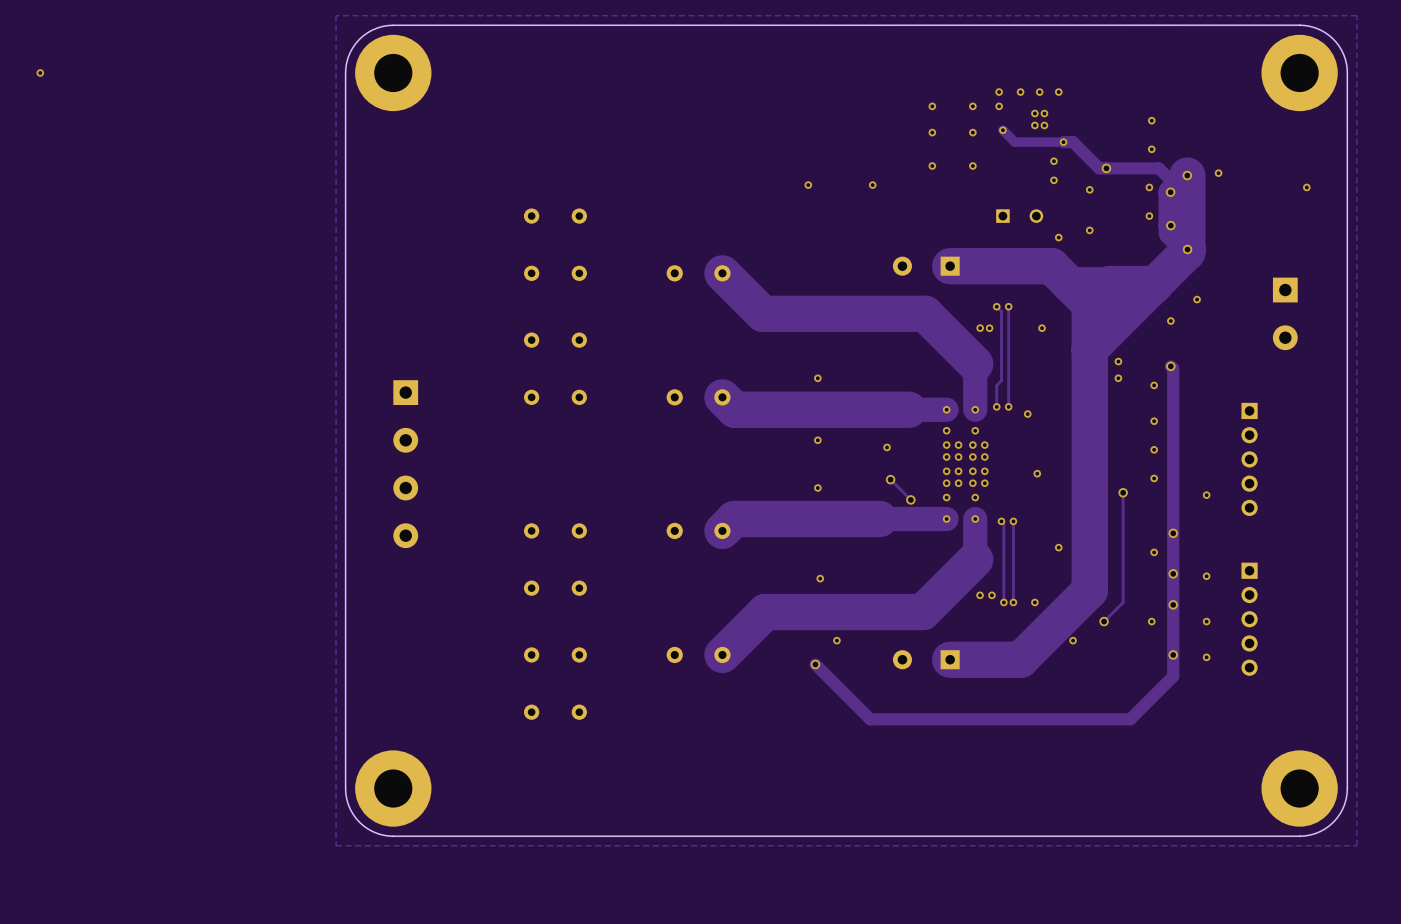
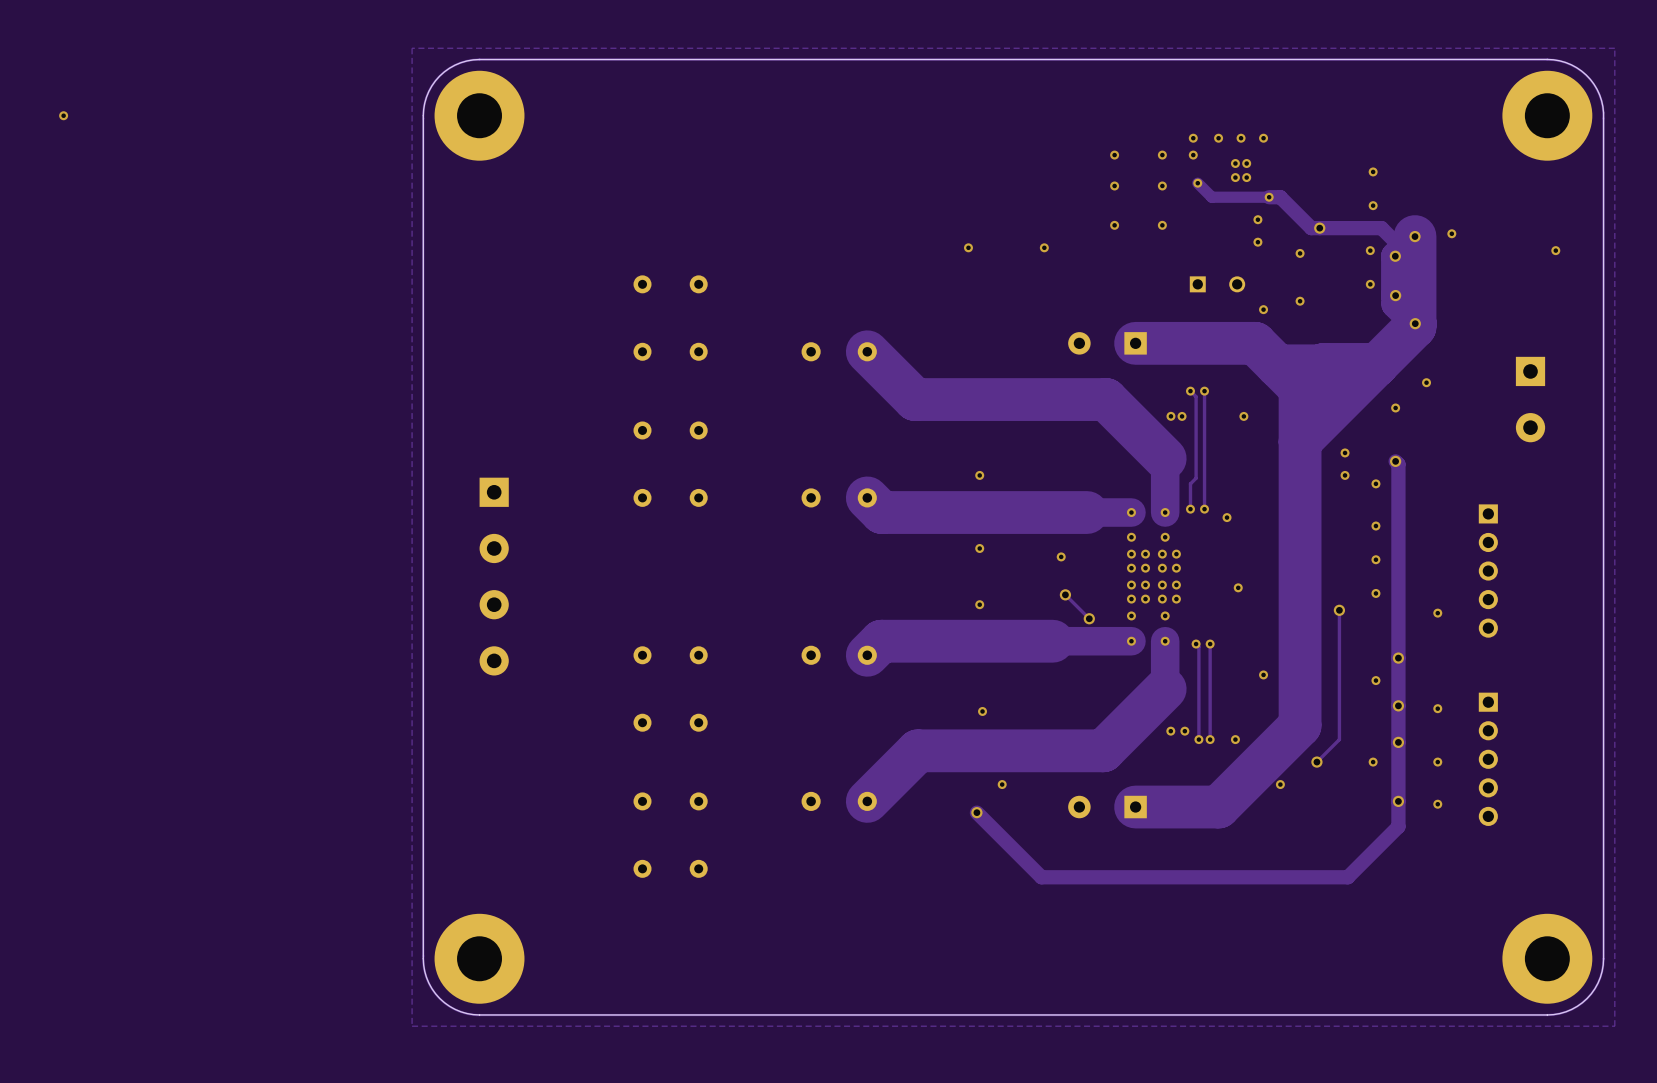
via: none -> (1345, 452)
via: (1118, 361) -> none
via: (1118, 378) -> none
via: none -> (1345, 475)

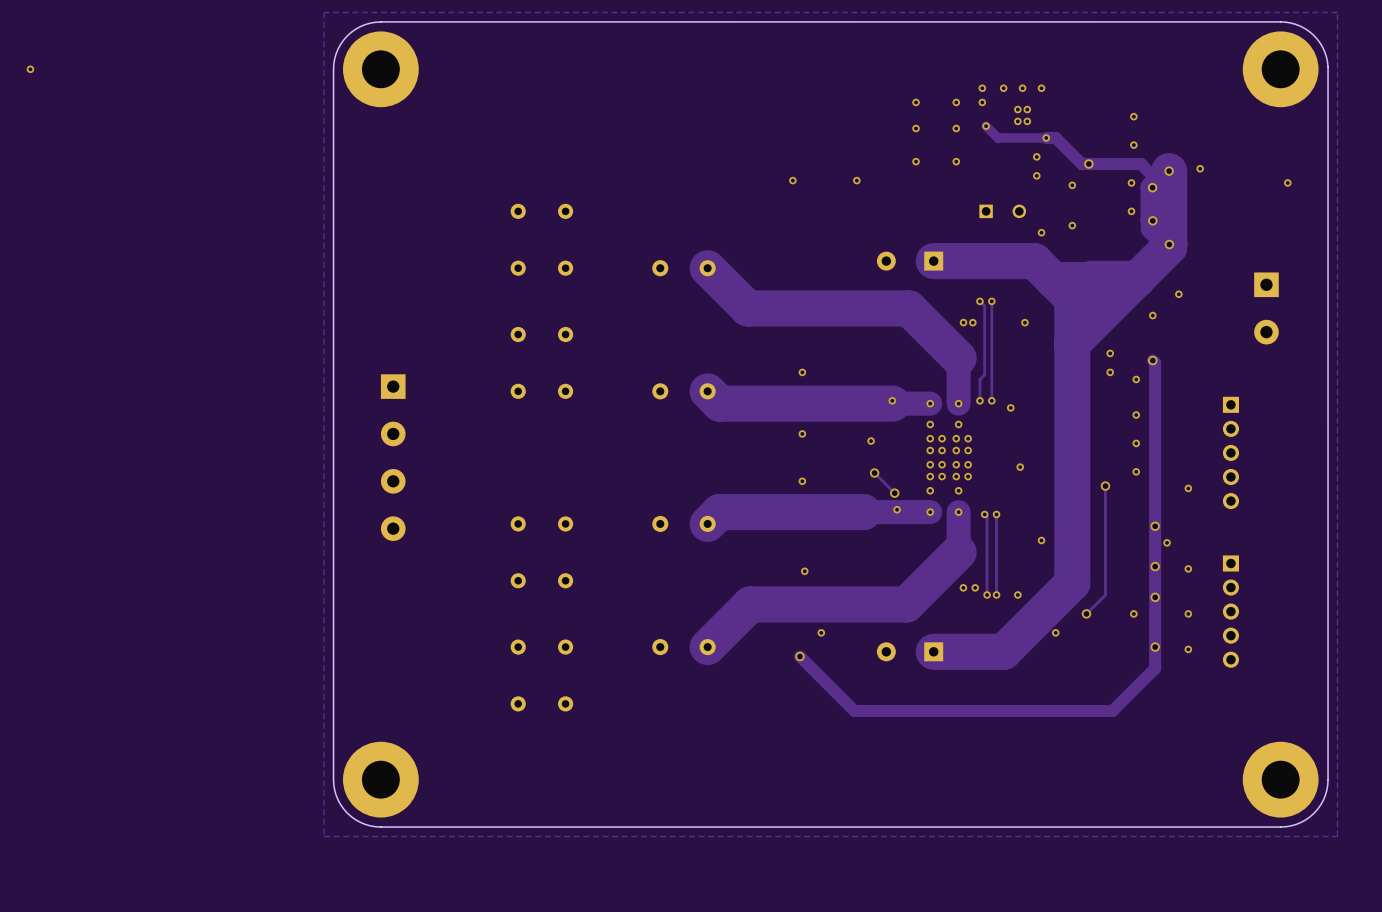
via: none -> (892, 400)
via: none -> (897, 509)
via position: (1375, 680) -> (1167, 542)

